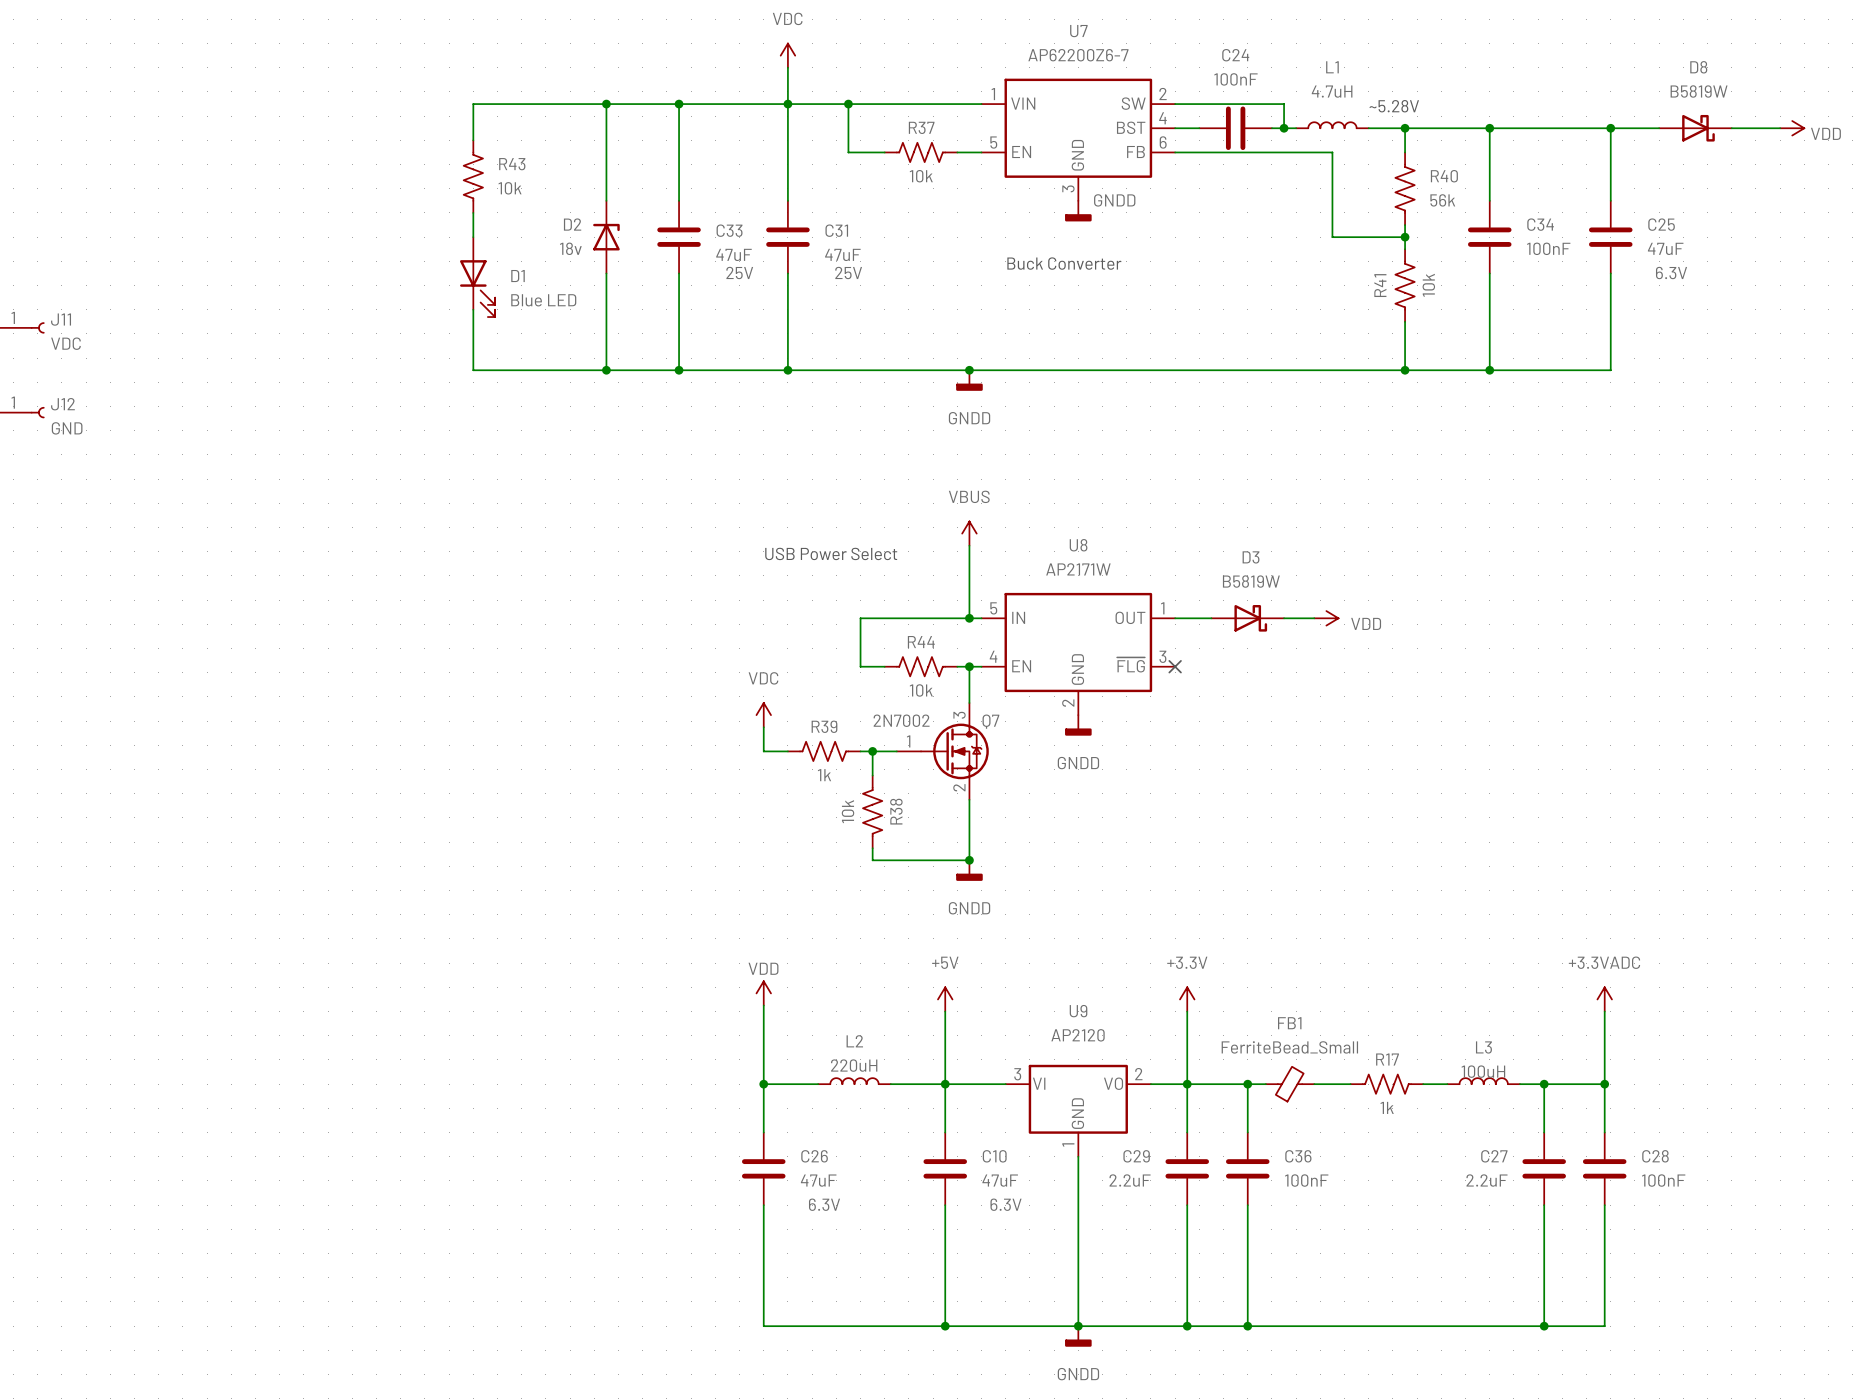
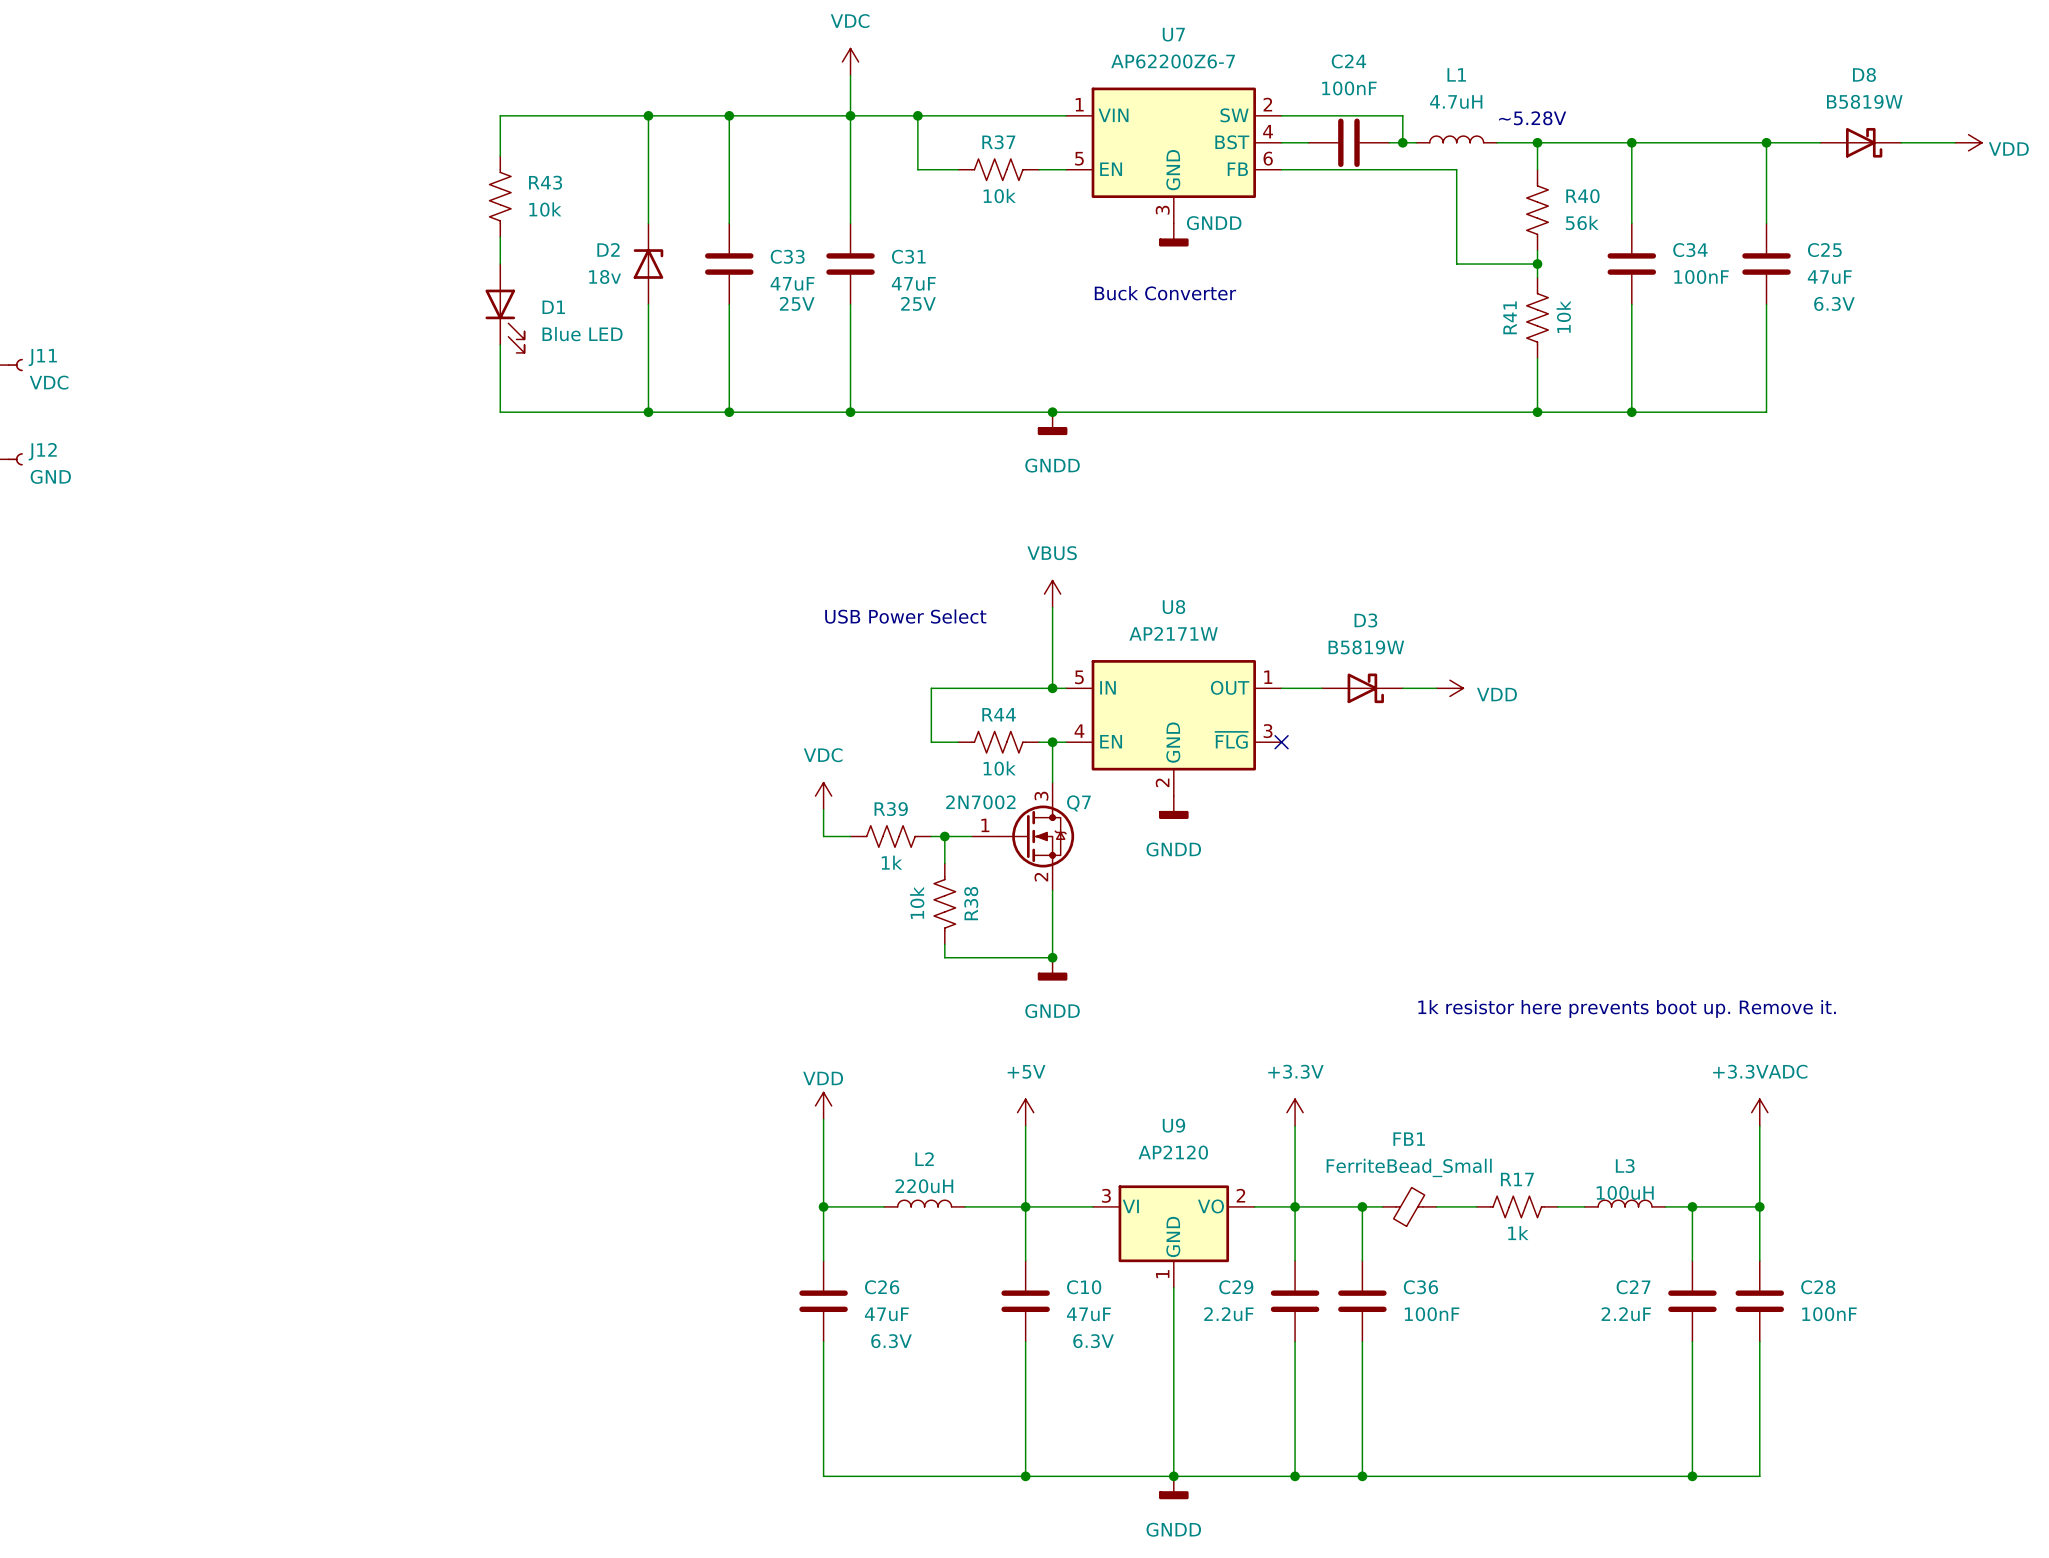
text: none -> 1k resistor here prevents boot up. Remove it. (1627, 1008)

